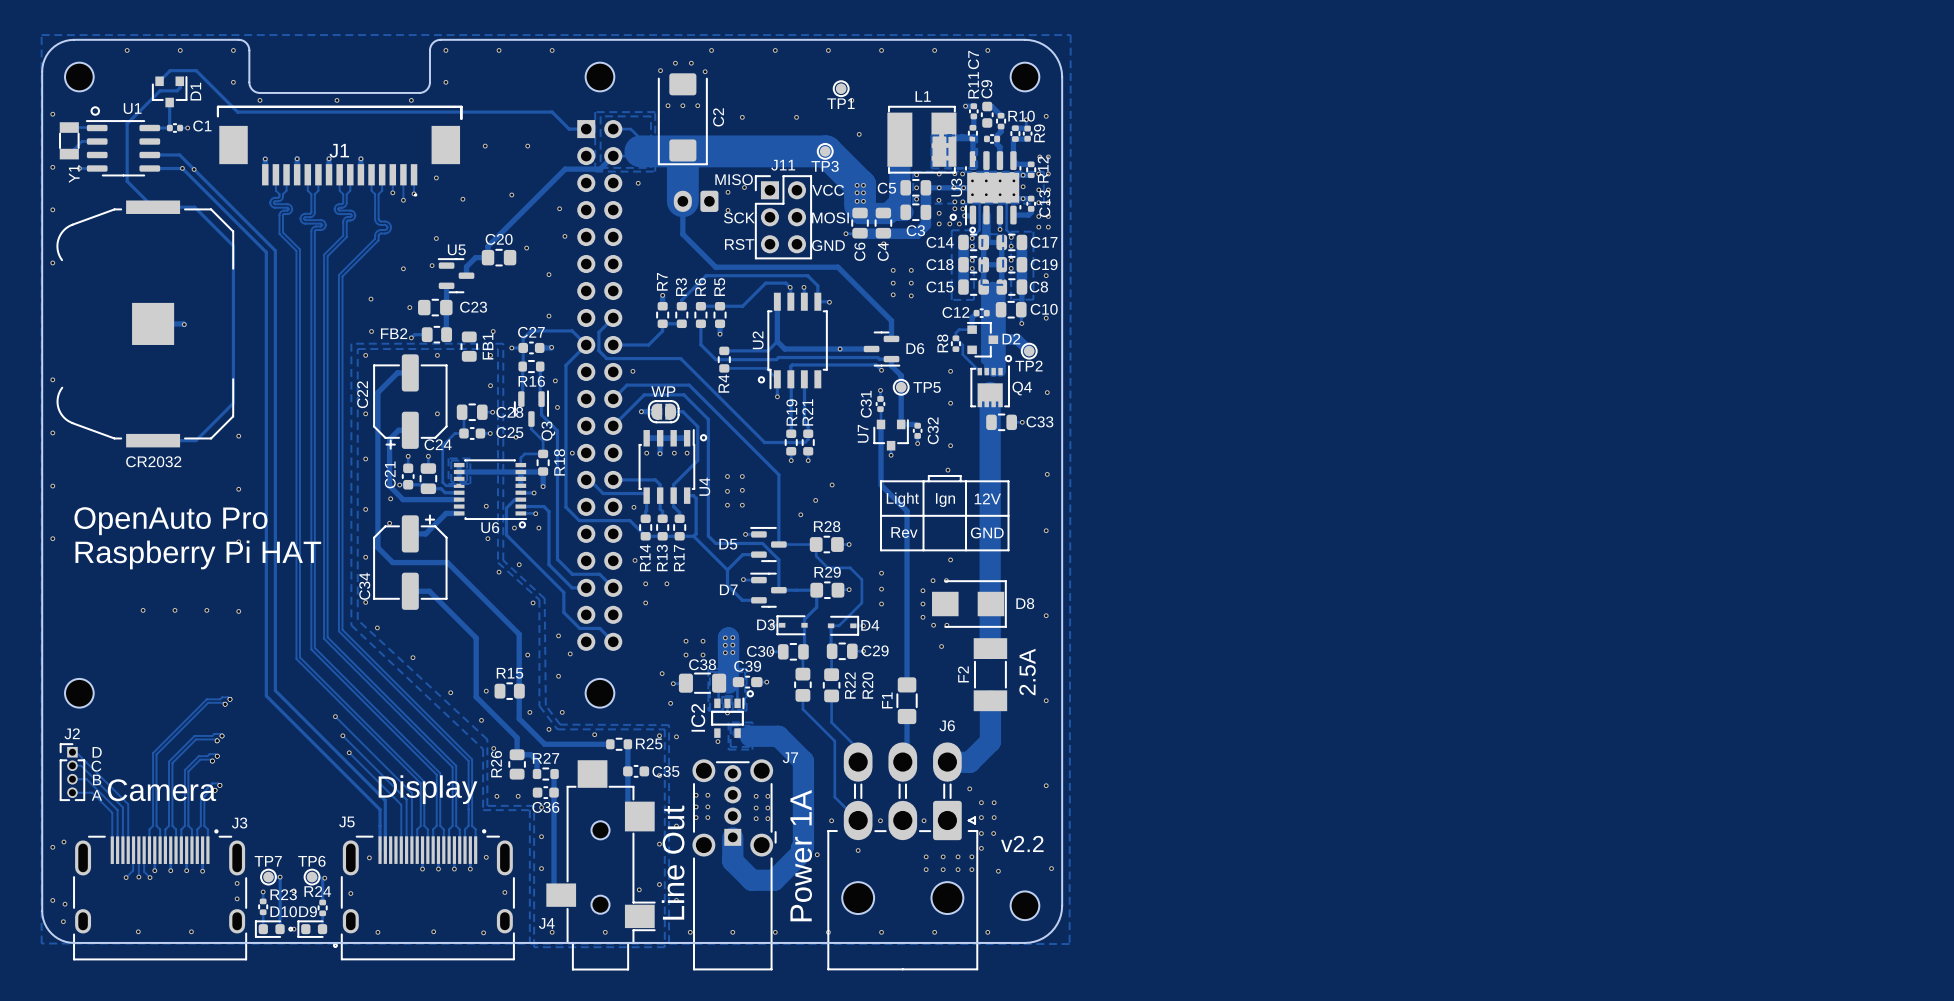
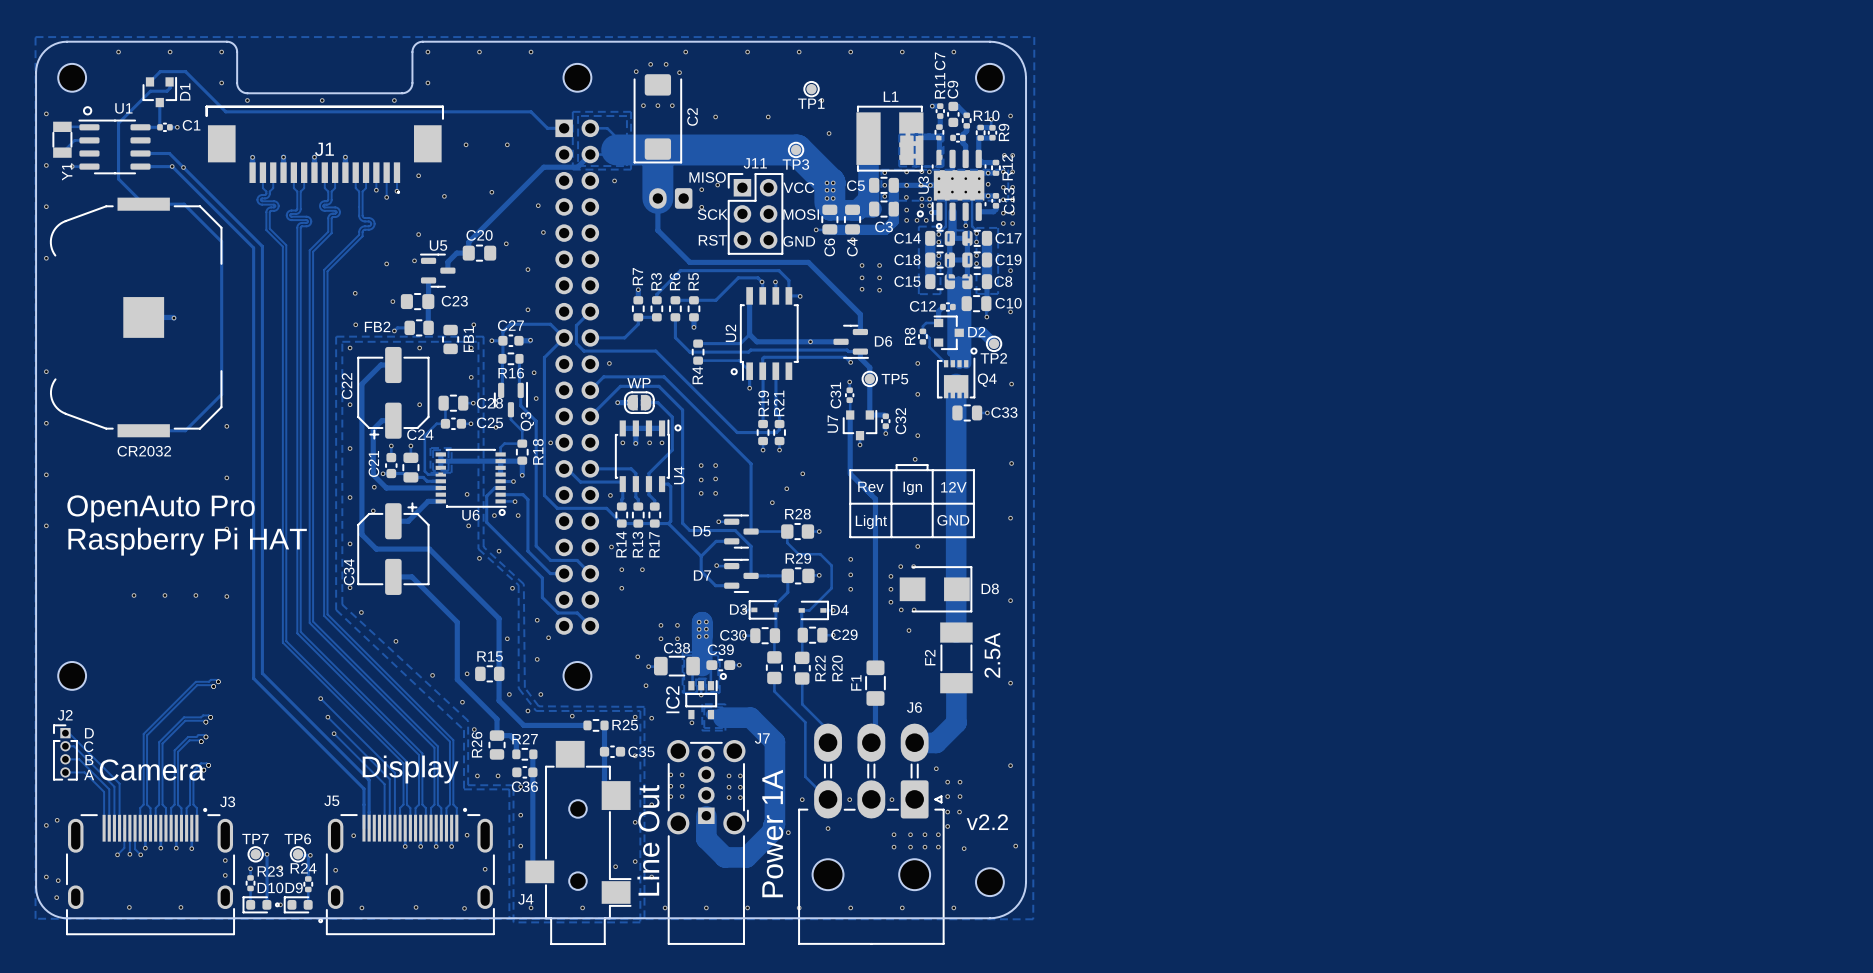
text: Light (902, 499) -> Rev (870, 486)
text: Rev (904, 532) -> Light (871, 522)

